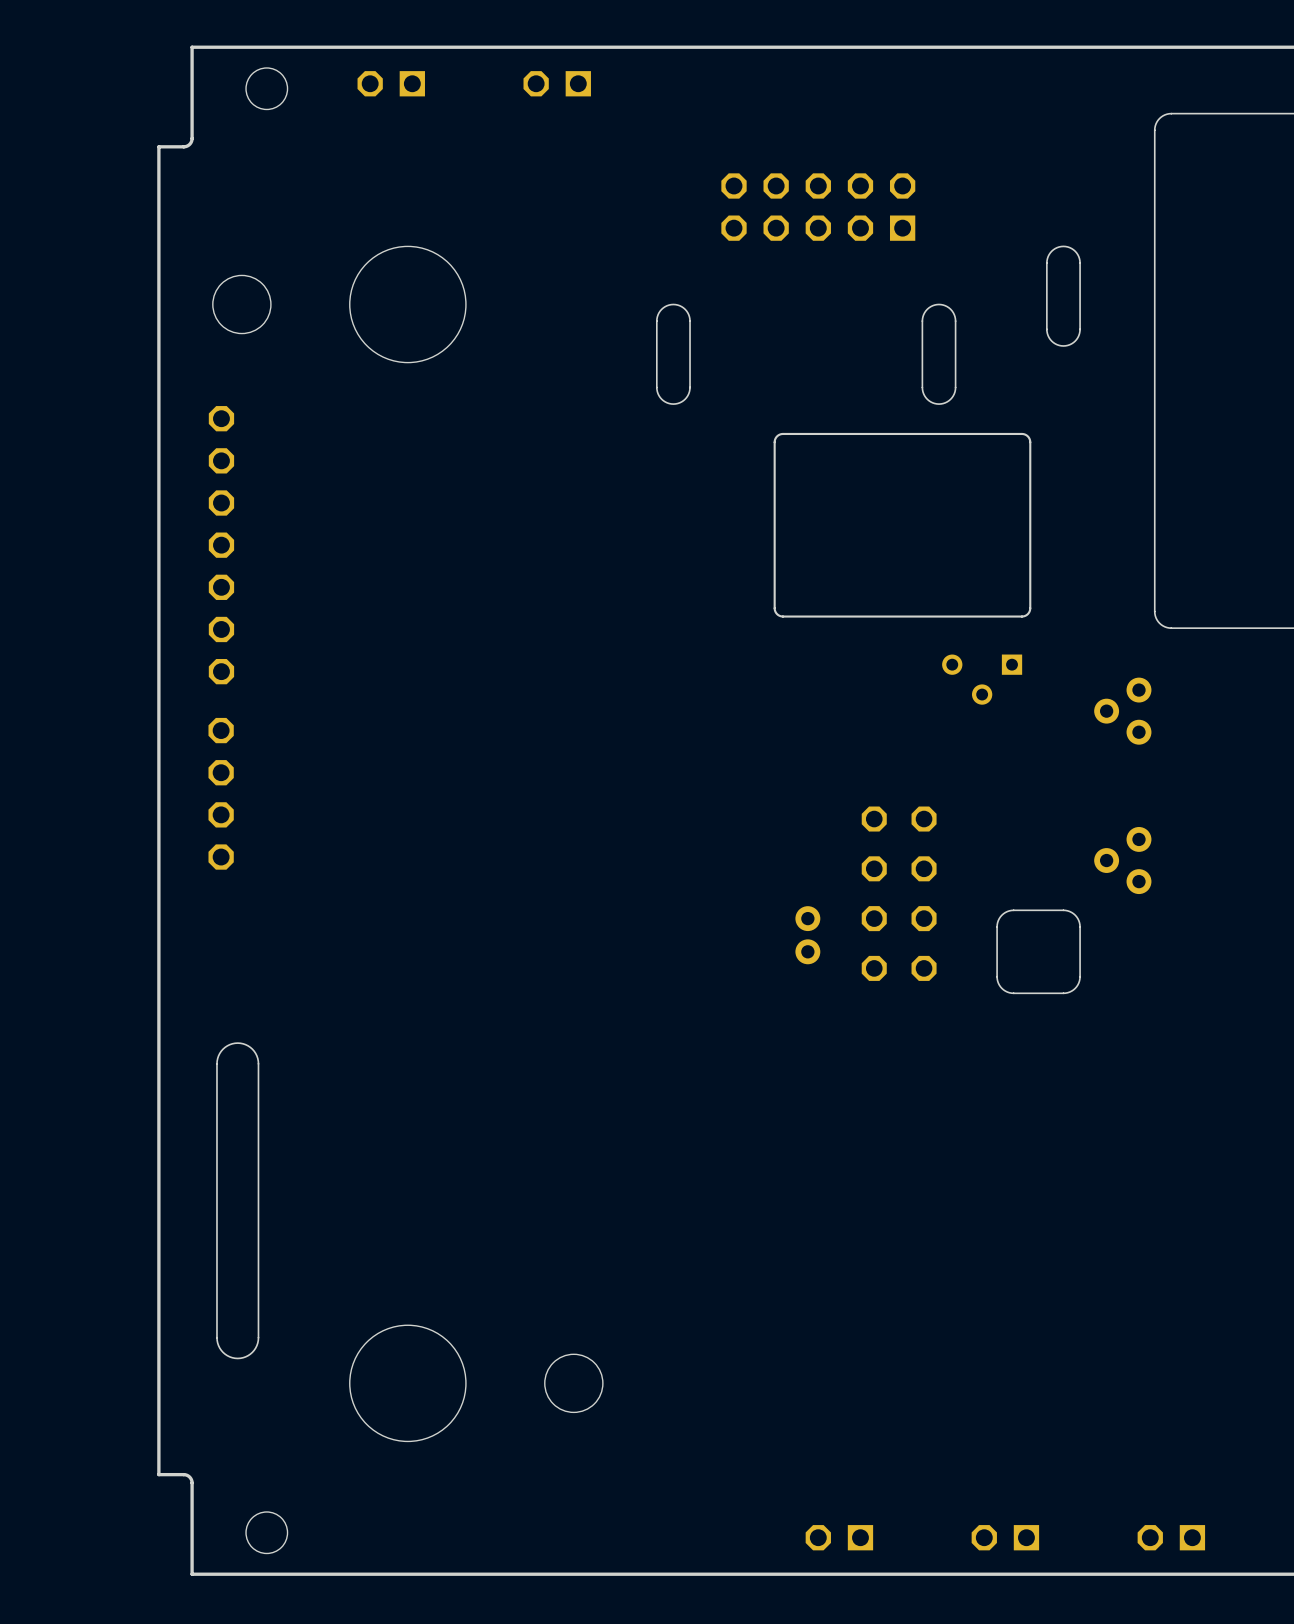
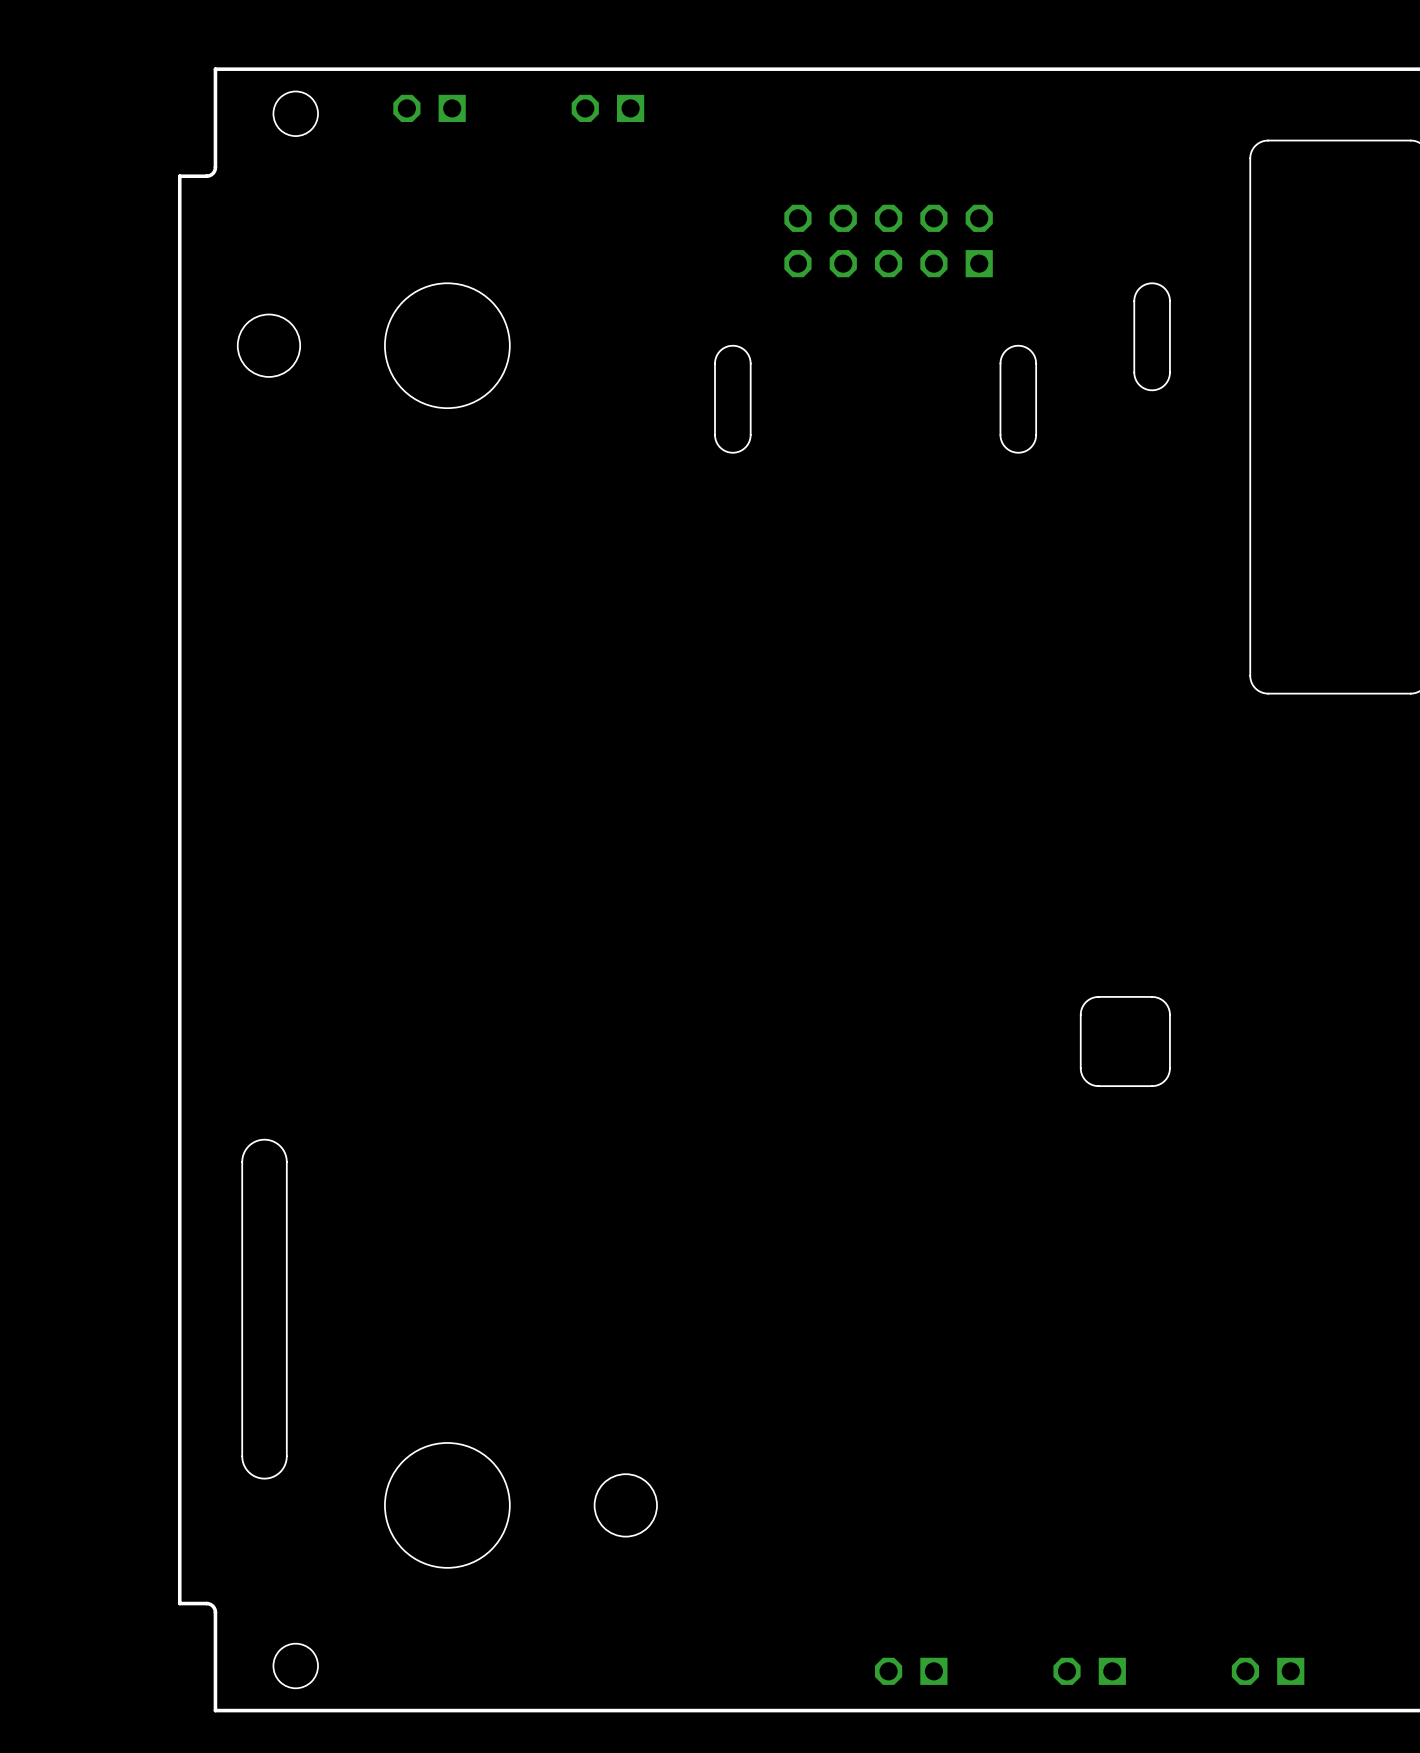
part: (902, 525) -> none
part: (221, 545) -> none
part: (982, 679) -> none
part: (1122, 711) -> none
part: (221, 793) -> none
part: (899, 819) -> none
part: (1122, 860) -> none
part: (899, 868) -> none
part: (899, 918) -> none
part: (807, 935) -> none
part: (899, 968) -> none

